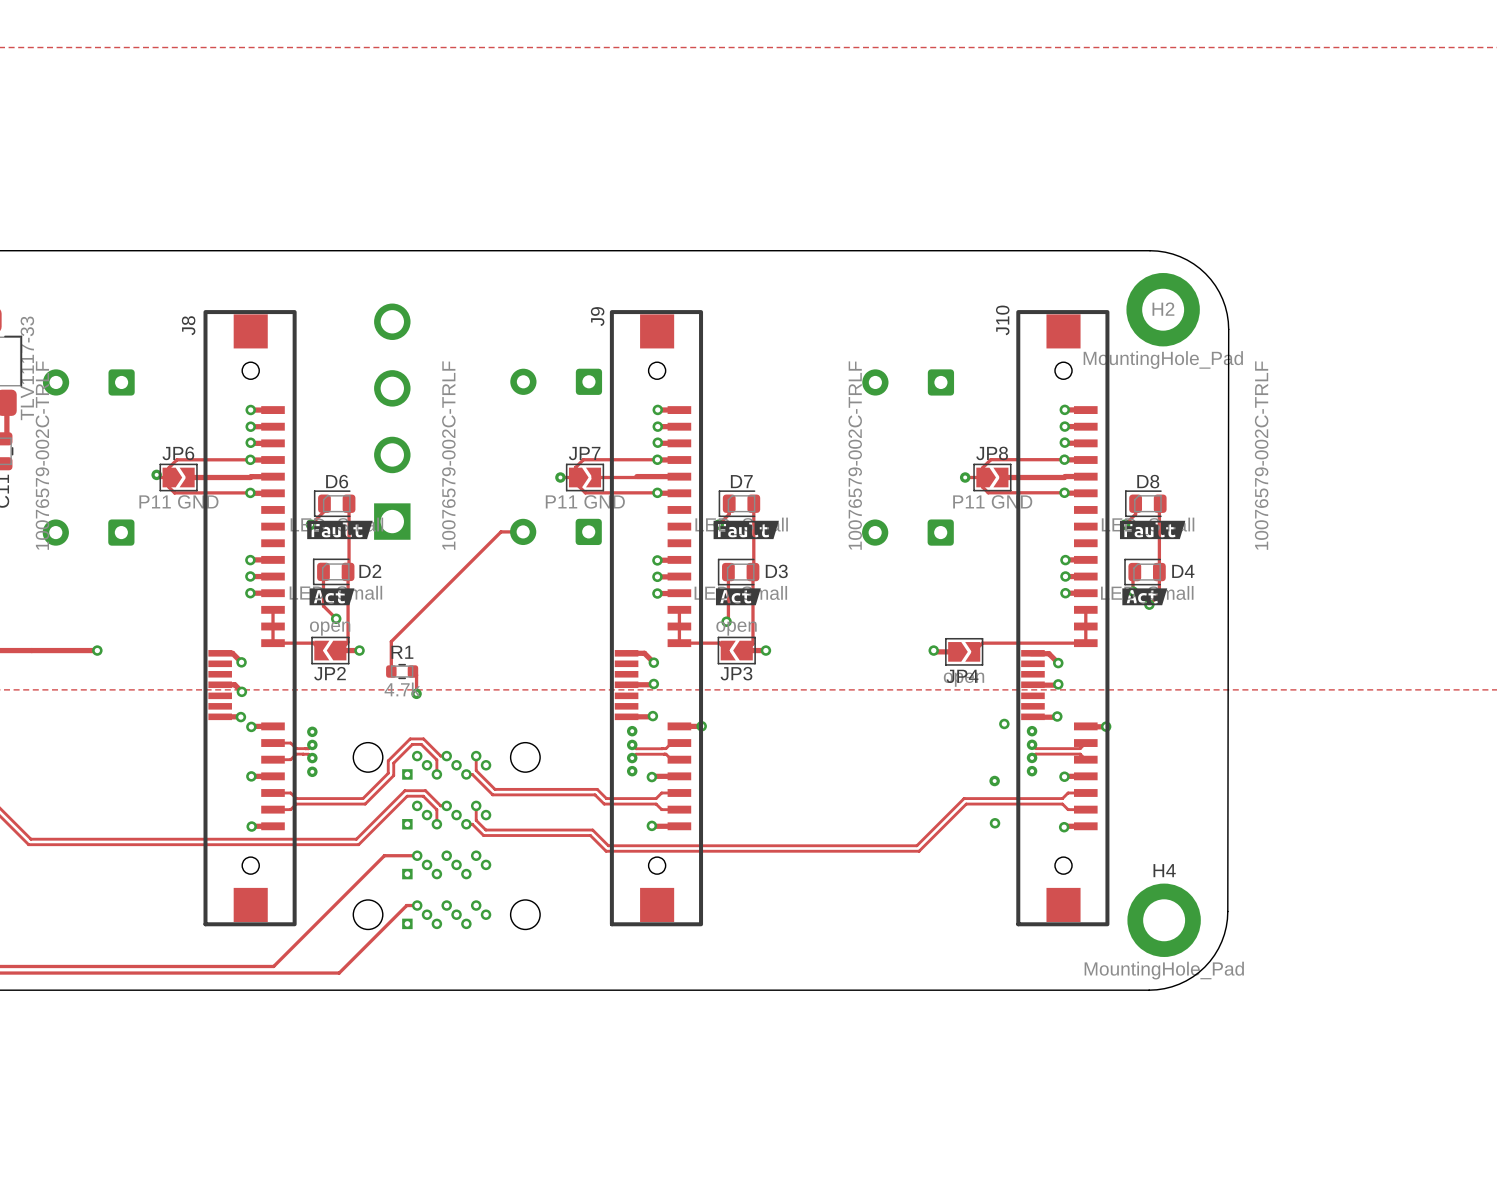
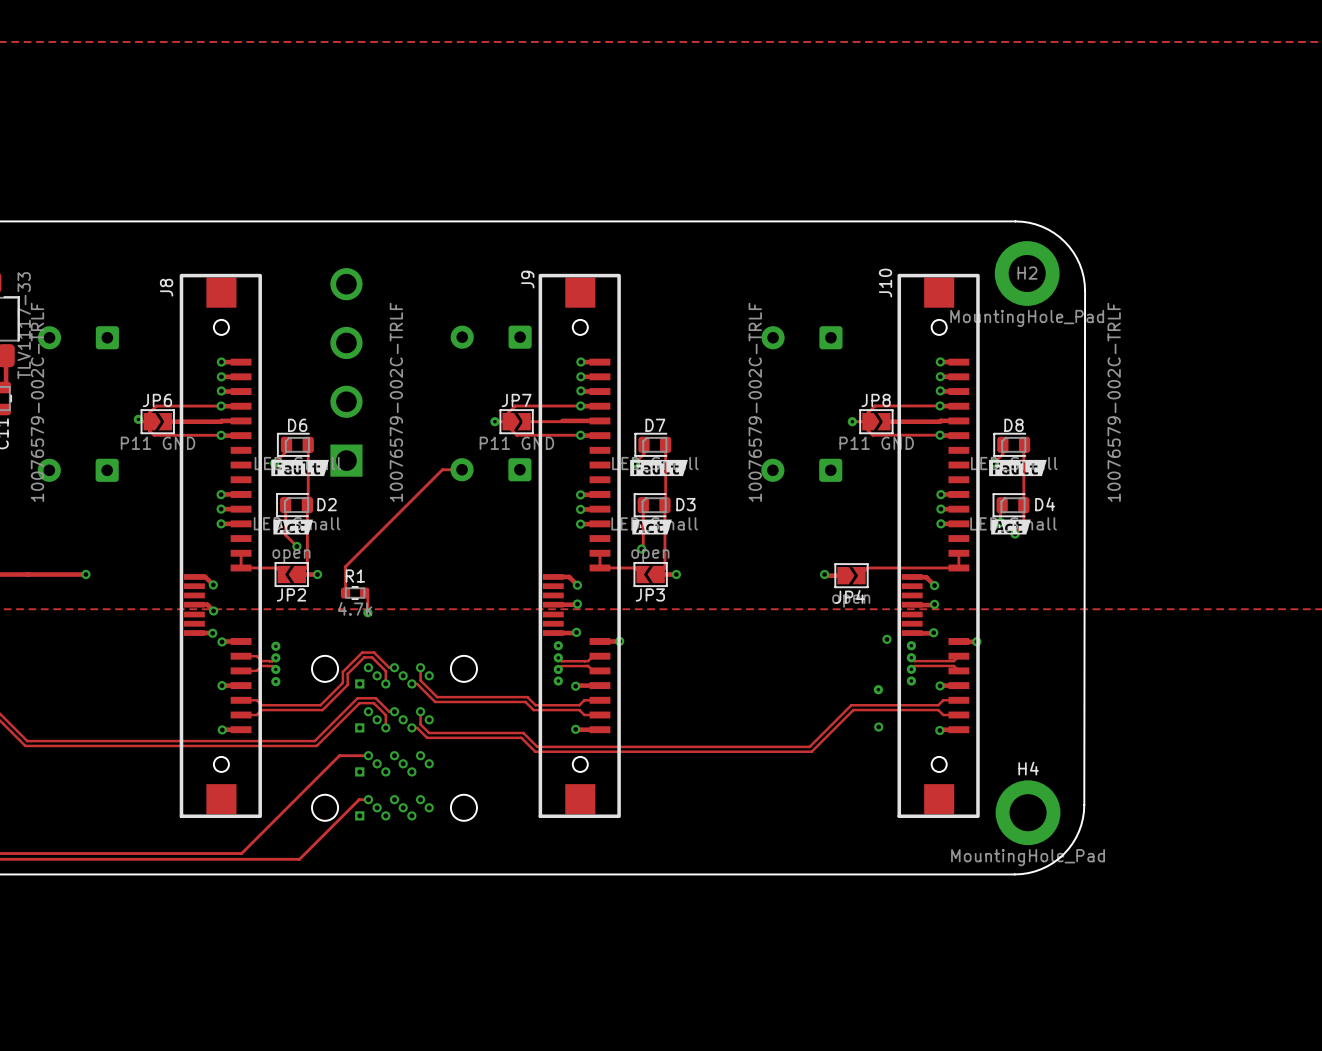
track: (273, 609) (273, 626) -> none
track: (679, 609) (679, 626) -> none
track: (1085, 609) (1085, 626) -> none

